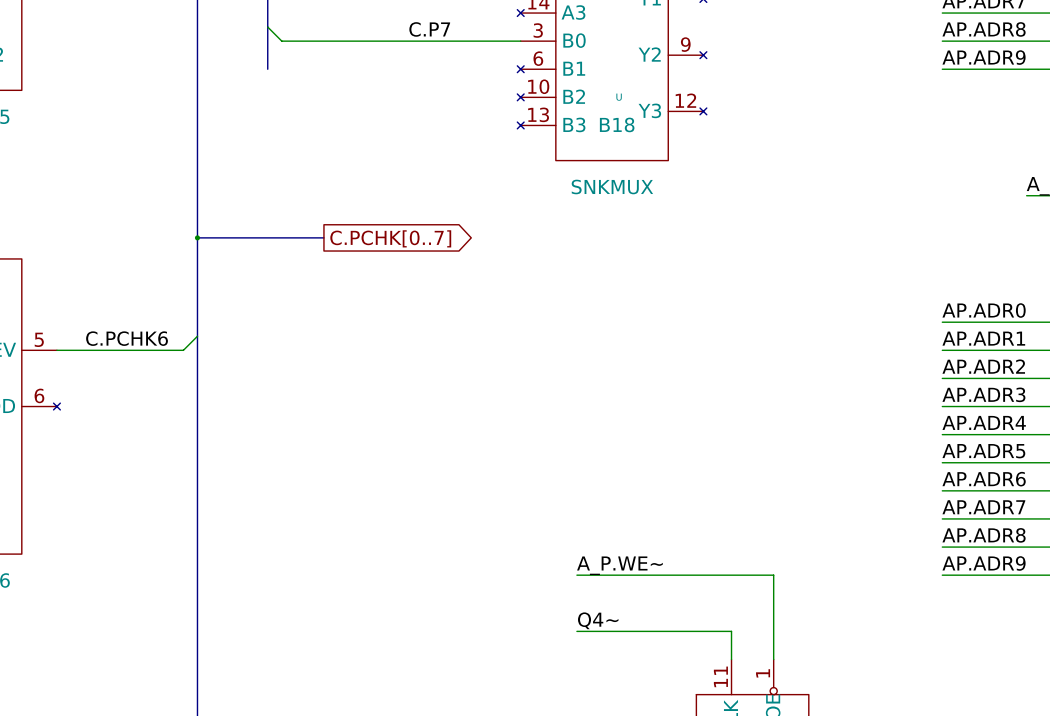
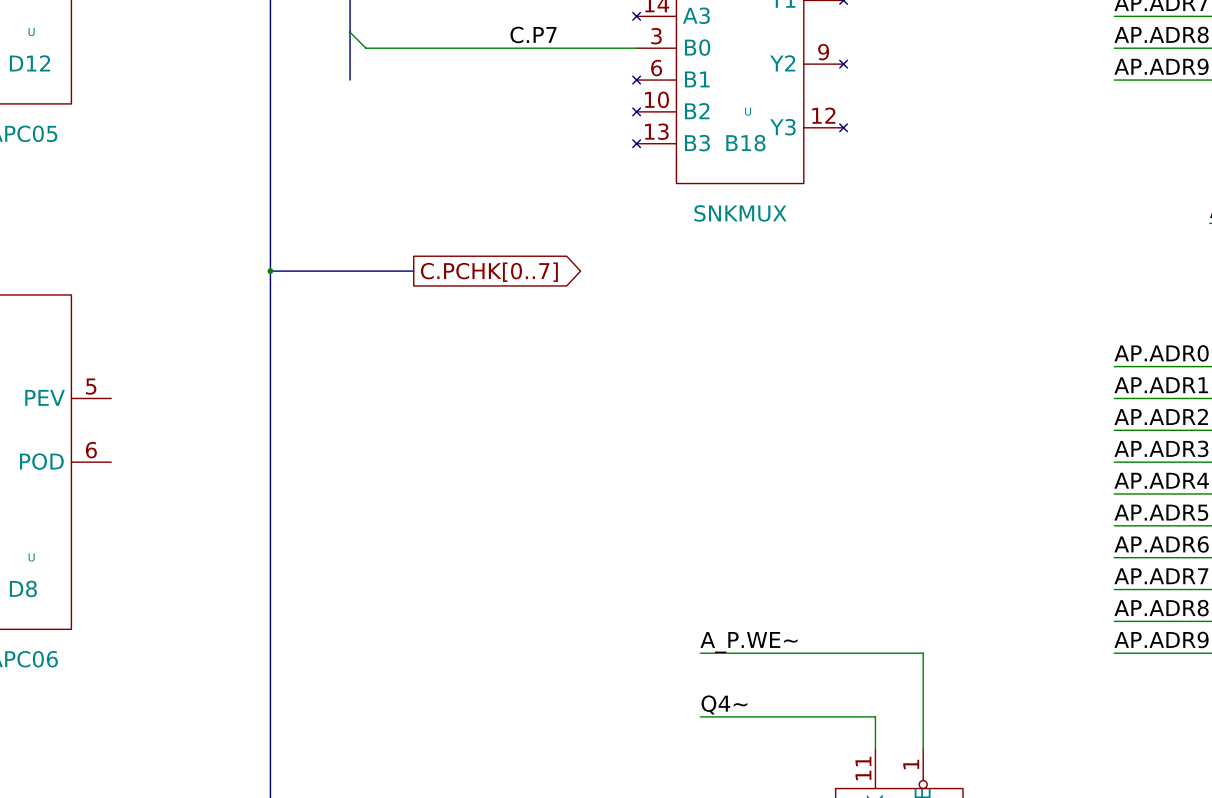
wire: (197, 336) (183, 350) (56, 350) -> none
label: C.PCHK6 (127, 338) -> none
no-connect mark: (56, 406) -> none

